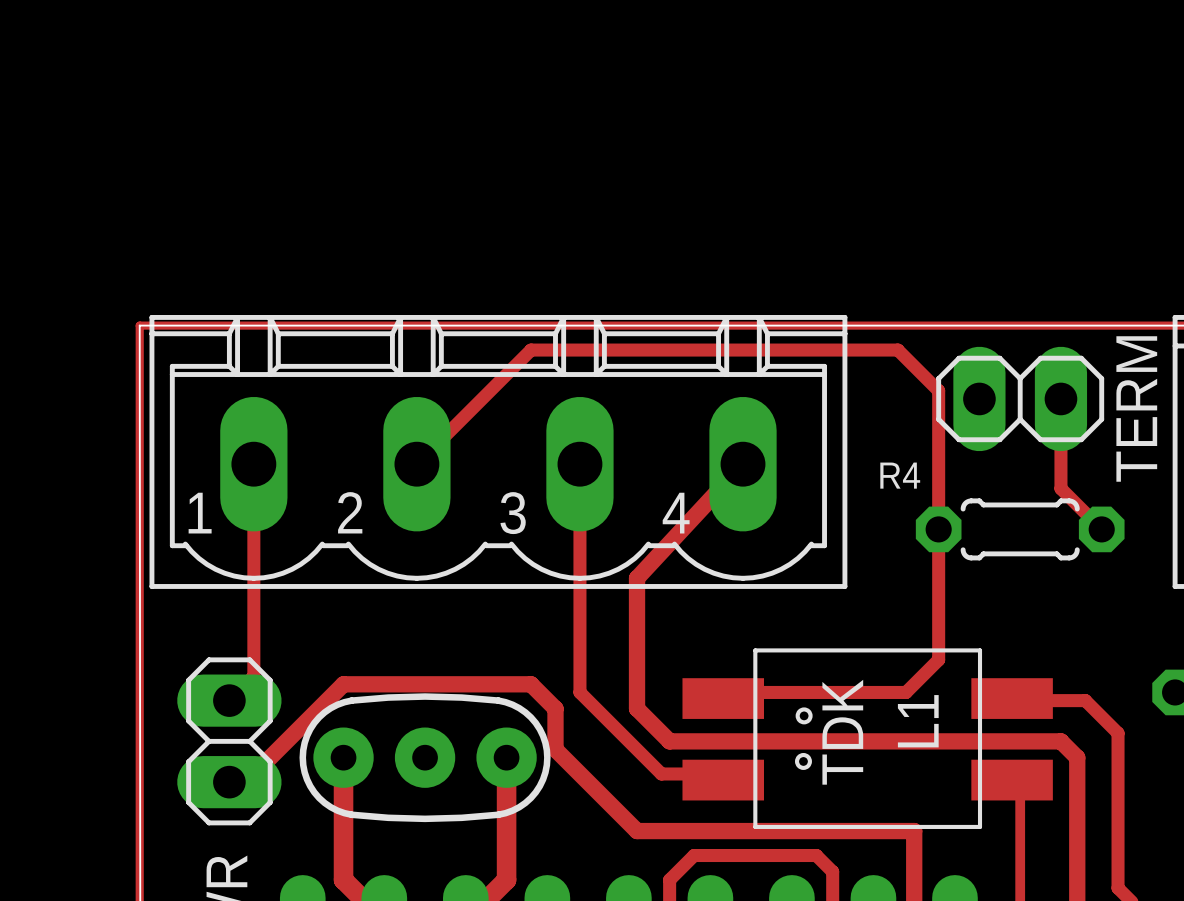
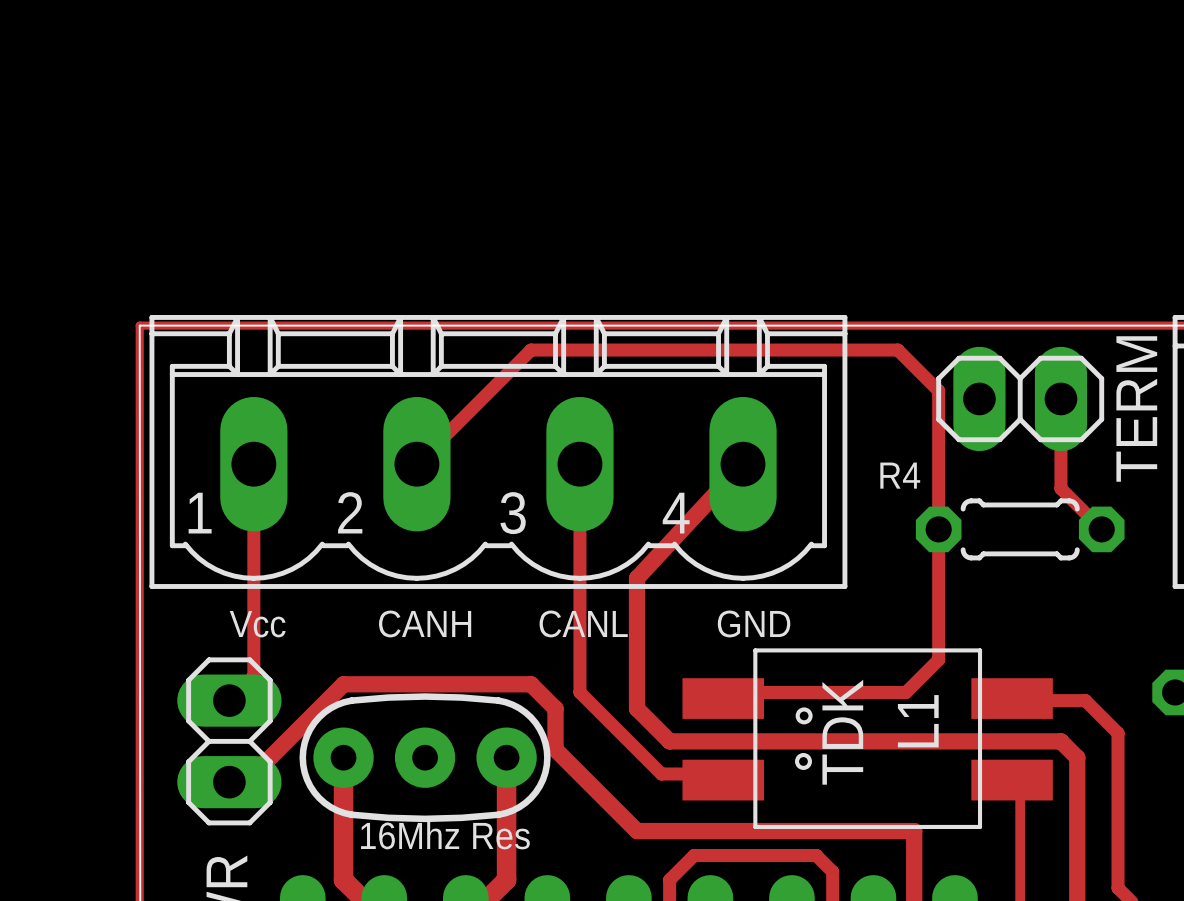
text: none -> CANH (425, 623)
text: none -> CANL (583, 623)
text: none -> GND (754, 623)
text: none -> Vcc (257, 624)
text: none -> 16Mhz Res (445, 835)

